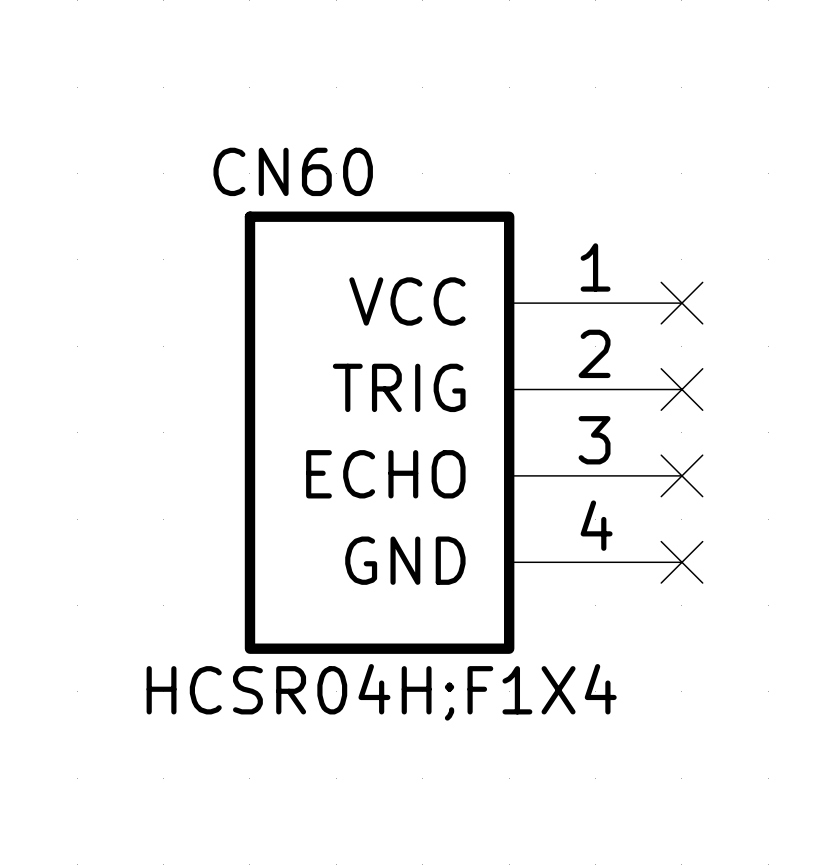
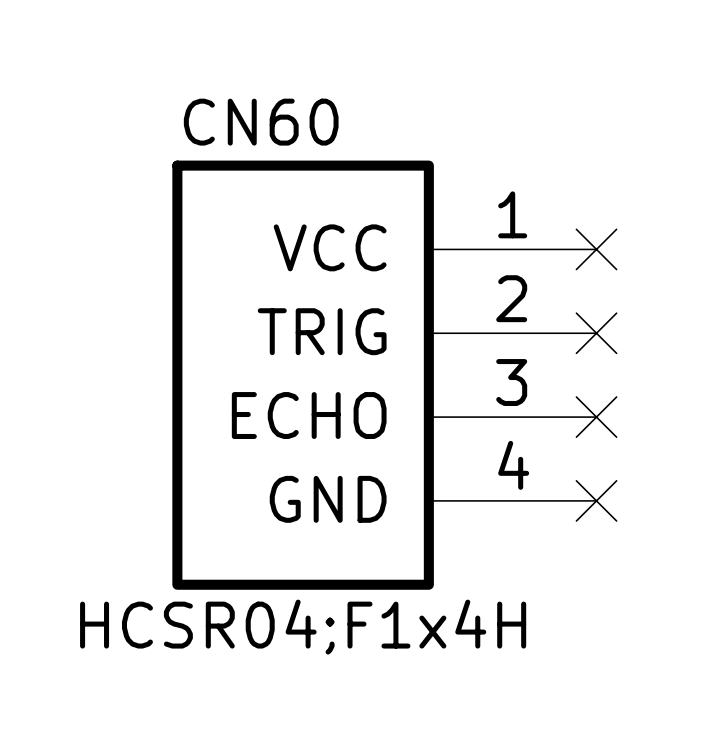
CN60 name position: CN60 (293, 171) -> CN60 (261, 122)
CN60 value: HCSR04H;F1X4 (381, 692) -> HCSR04;F1x4H (303, 627)

